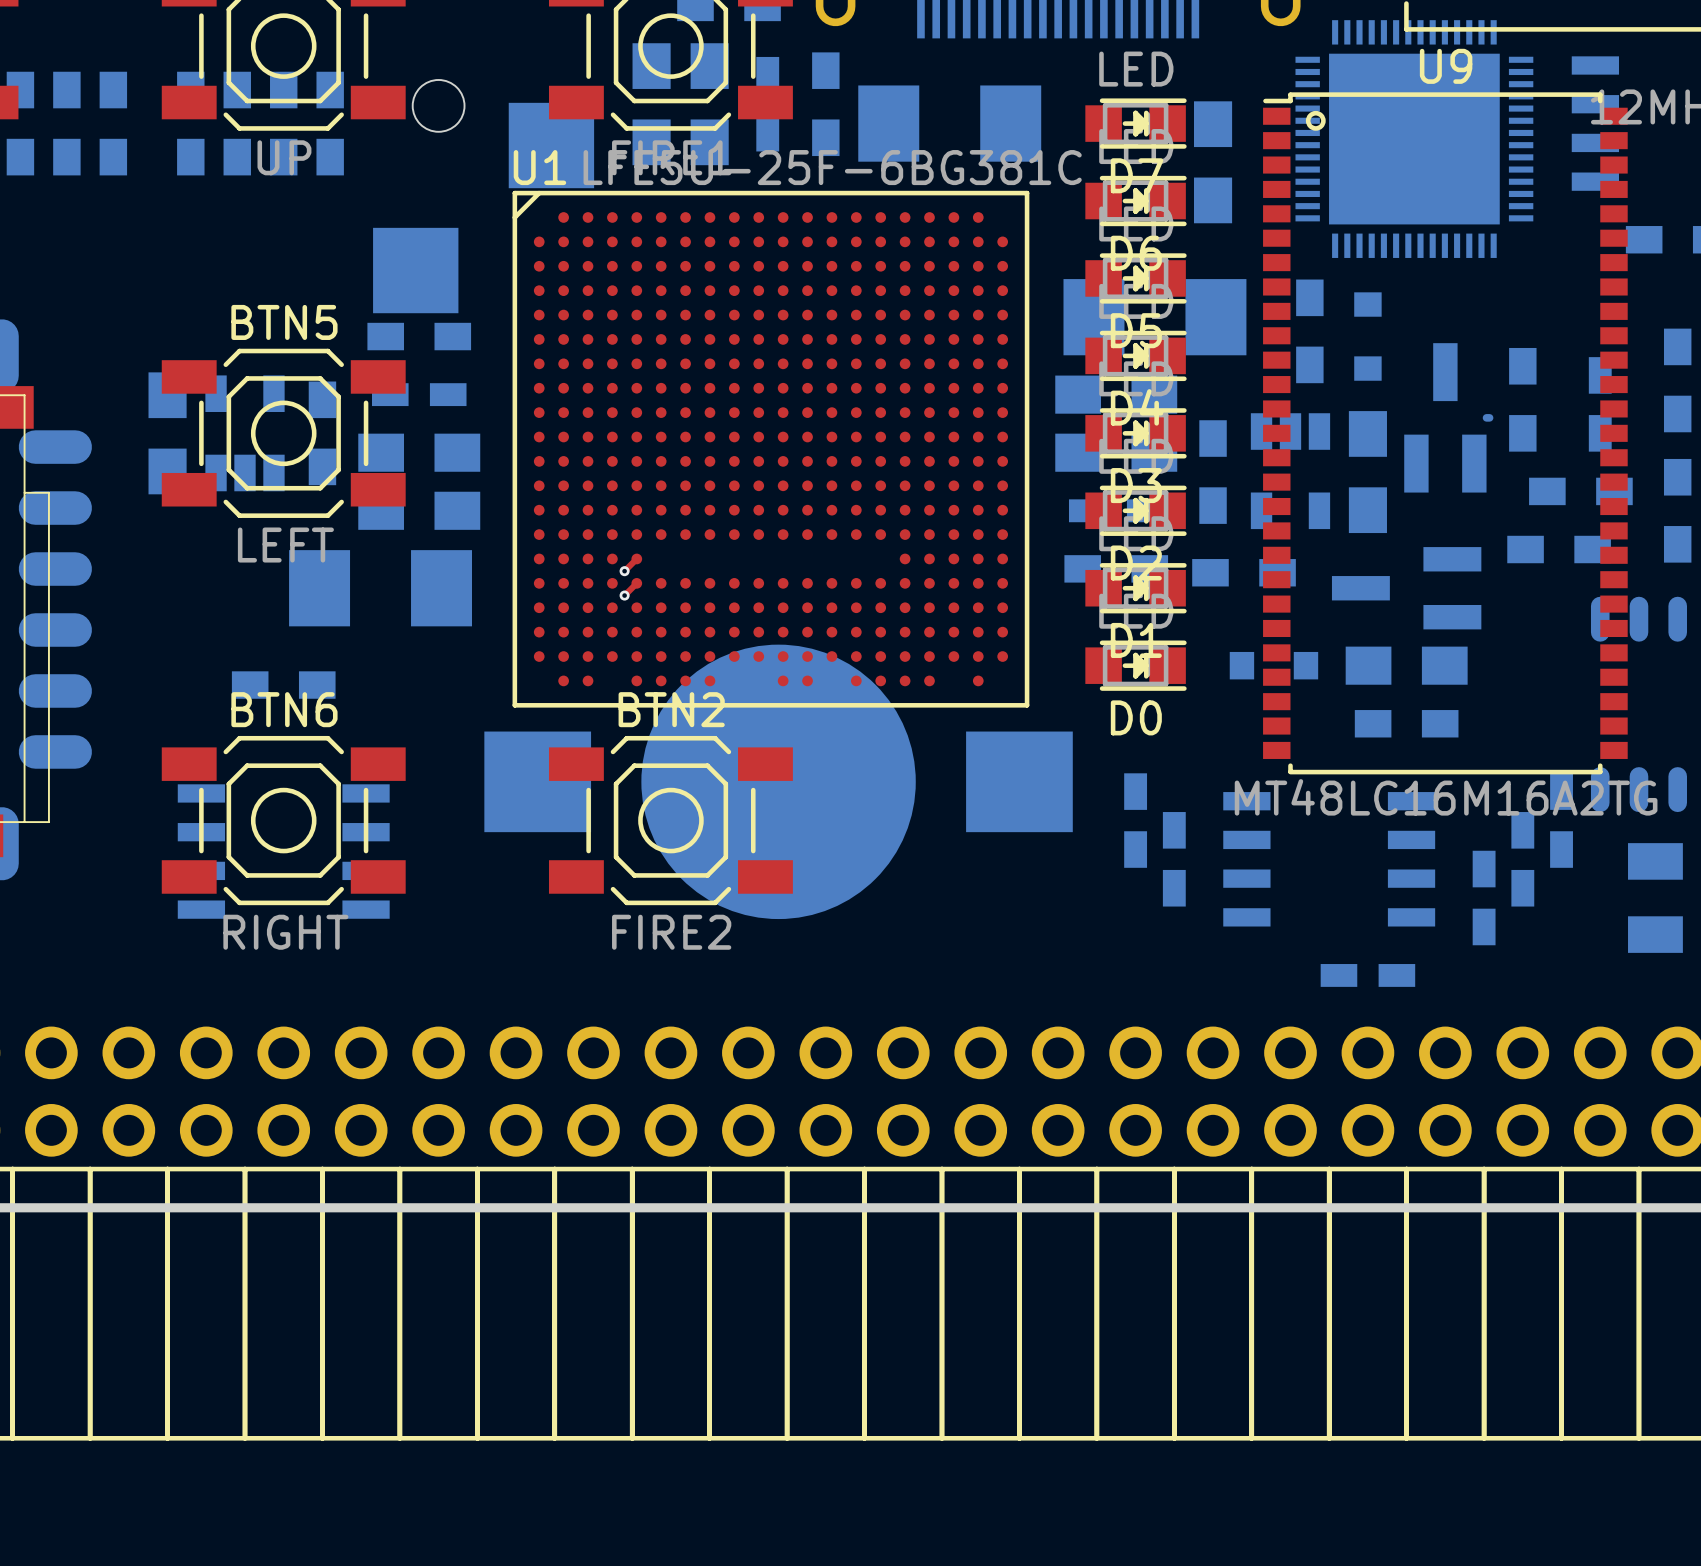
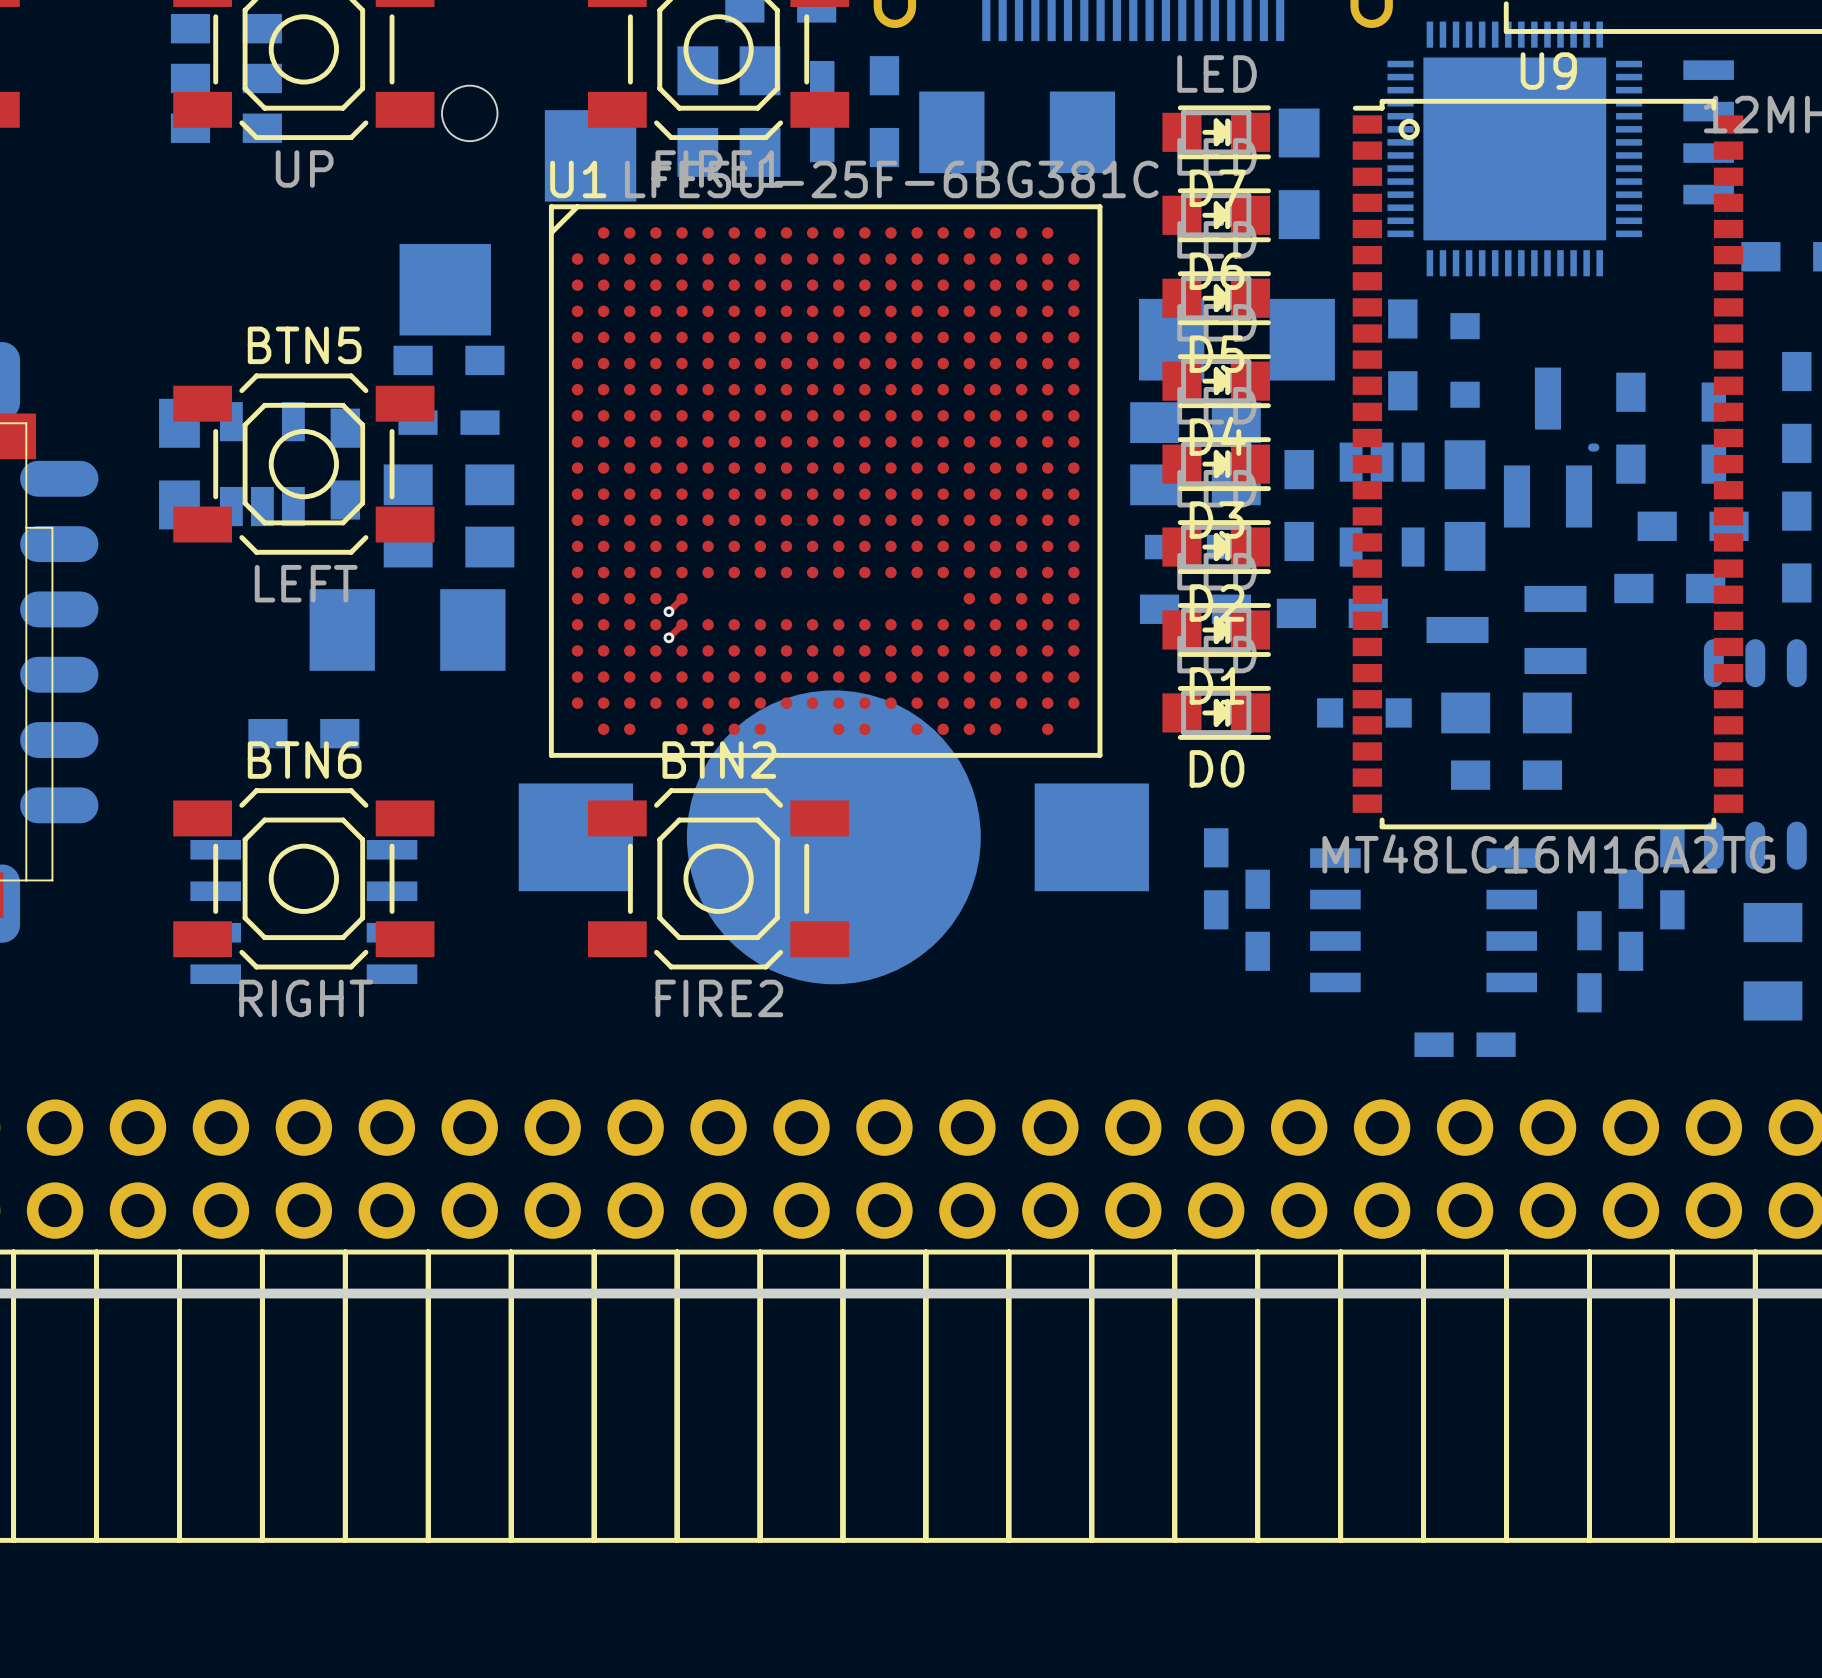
part: none -> (226, 28)
part: none -> (226, 78)
part: none -> (226, 128)
part: (20, 123) -> none
part: (66, 123) -> none
part: (113, 123) -> none
part: (190, 123) -> none
part: (237, 123) -> none
part: (283, 123) -> none
part: (330, 123) -> none

